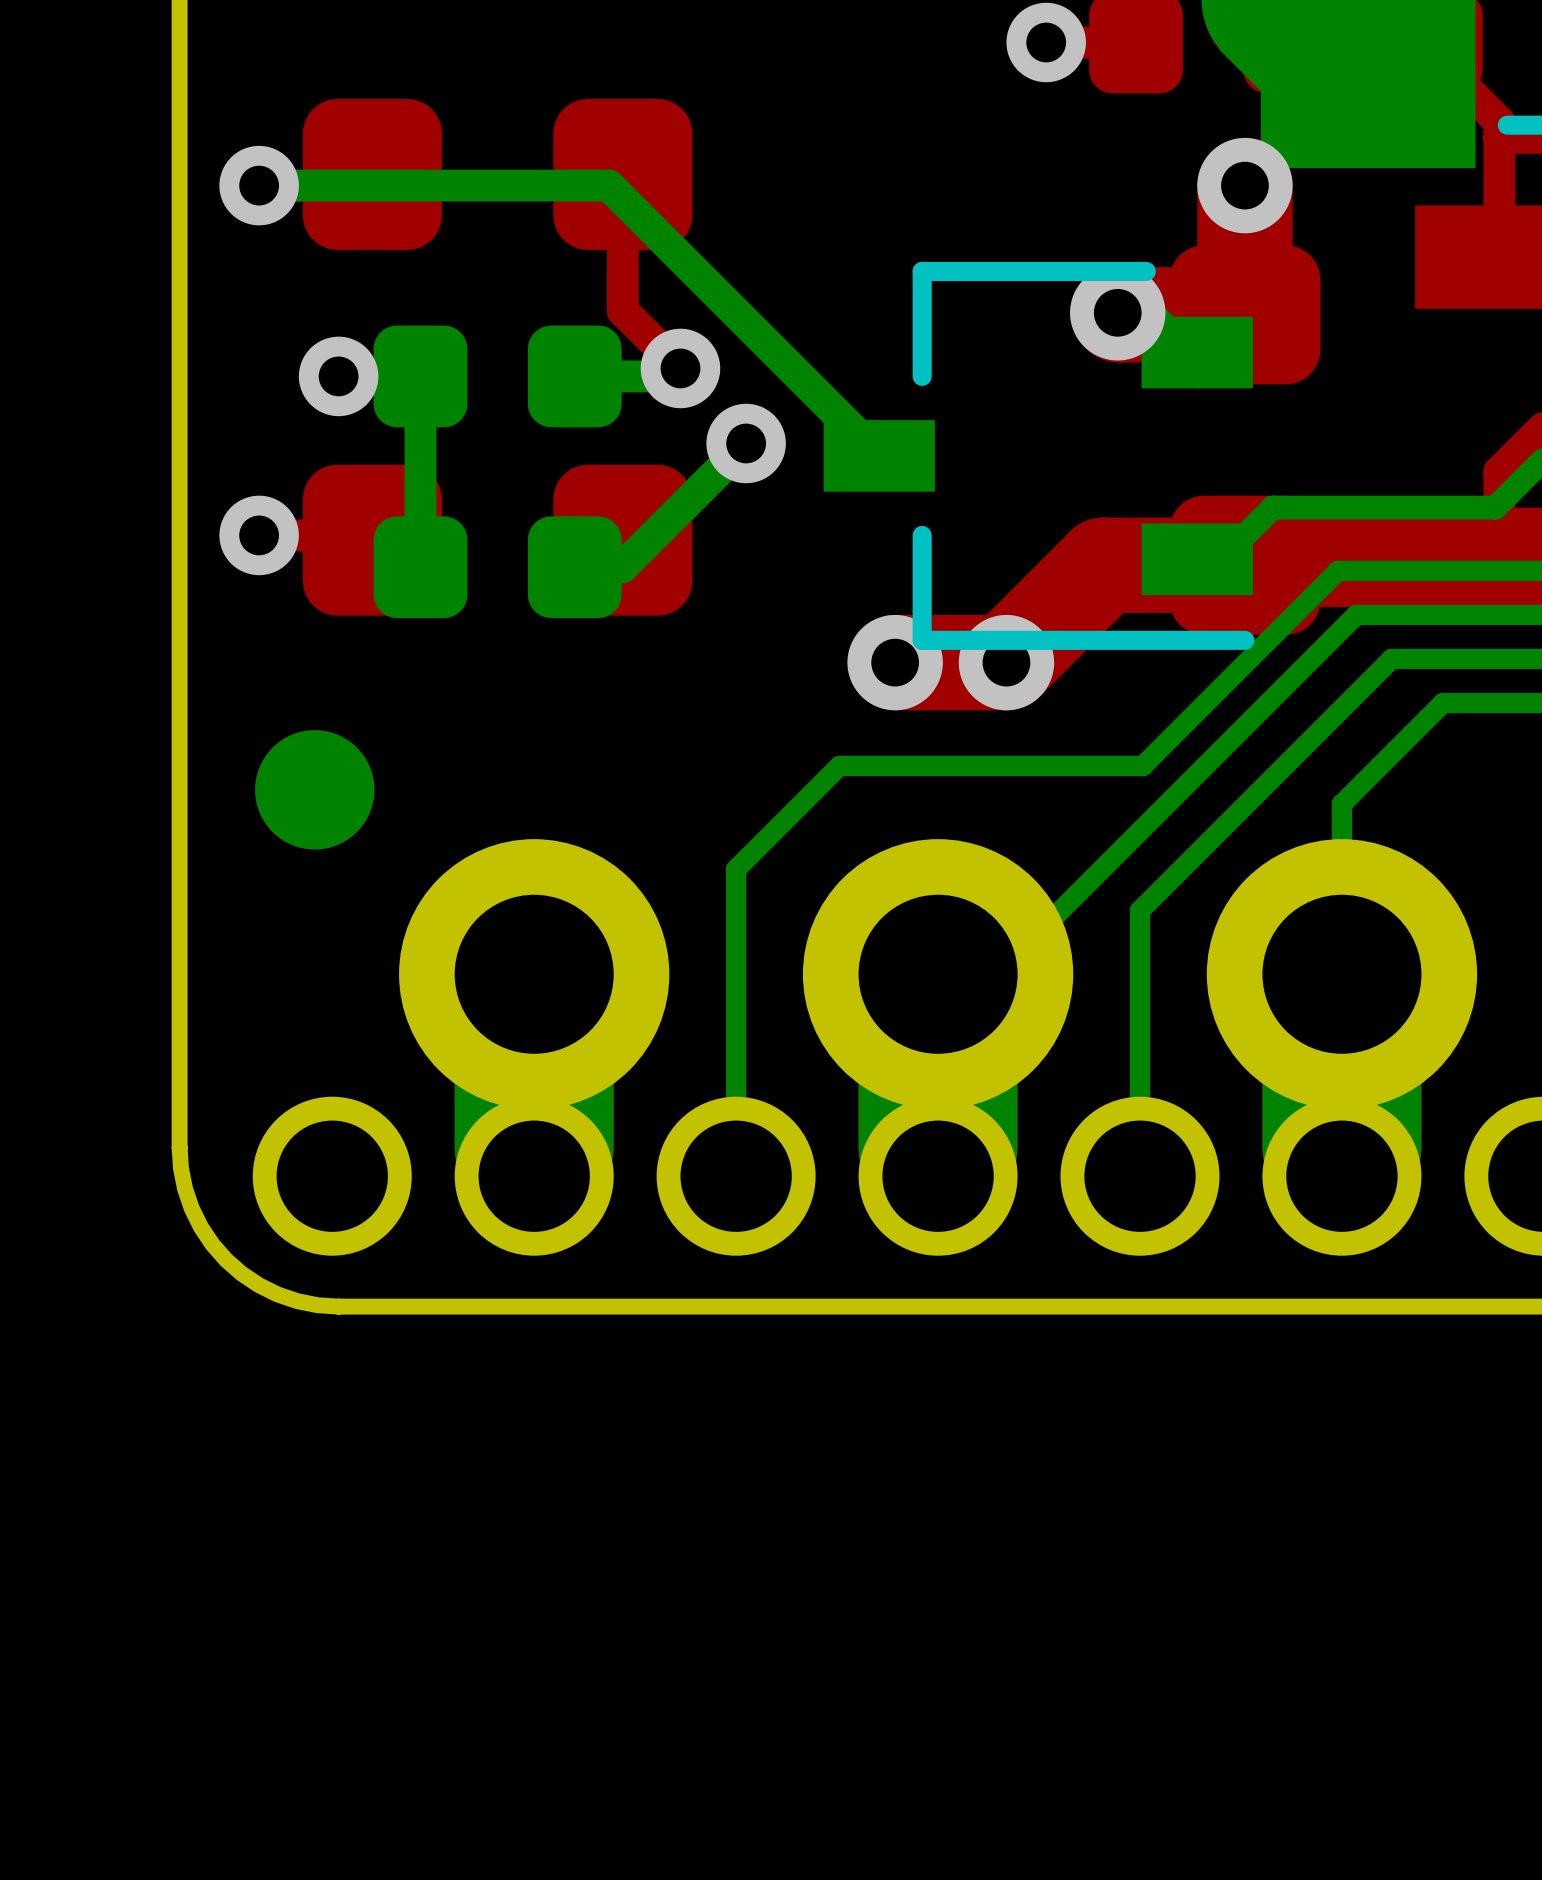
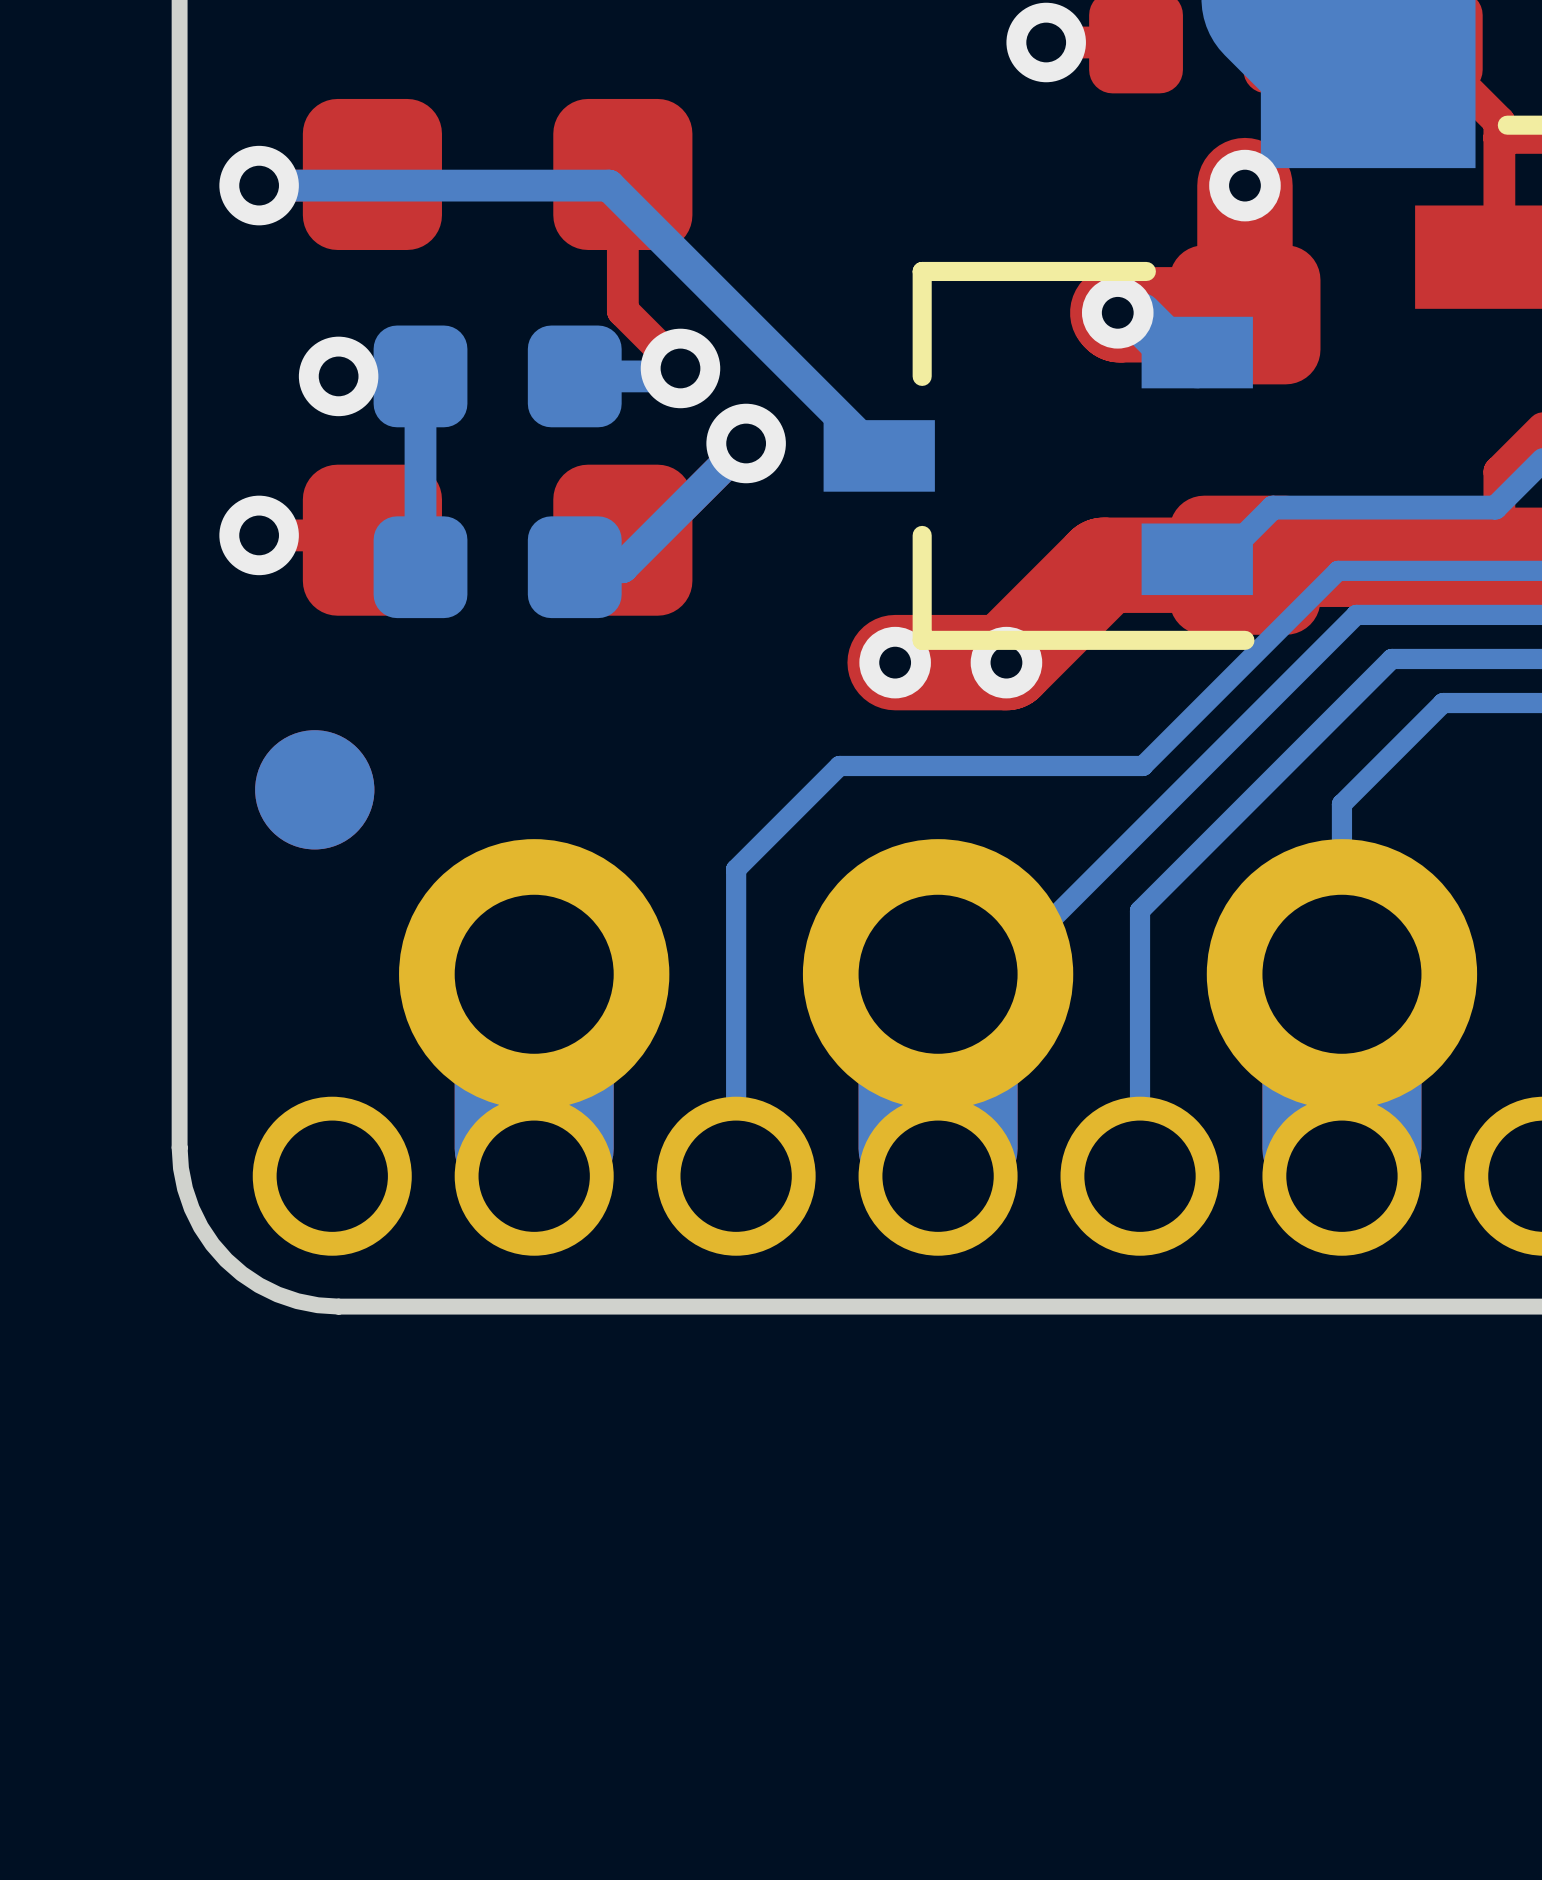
via size: [1197, 137, 1293, 234] -> [1209, 149, 1281, 222]
via size: [1070, 265, 1166, 361] -> [1081, 277, 1154, 349]
via size: [847, 614, 943, 711] -> [859, 626, 931, 699]
via size: [958, 614, 1055, 711] -> [970, 626, 1043, 699]

